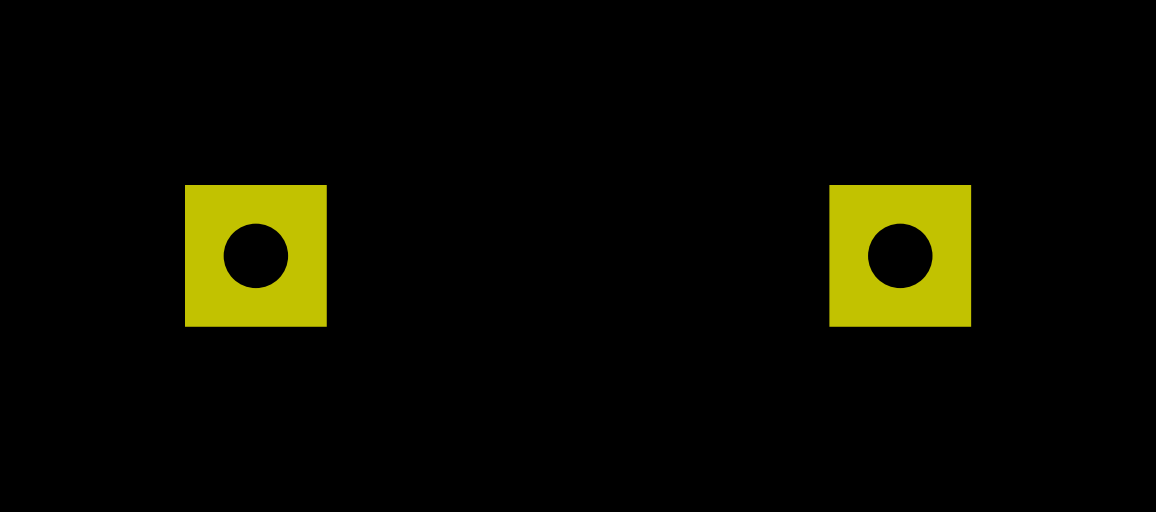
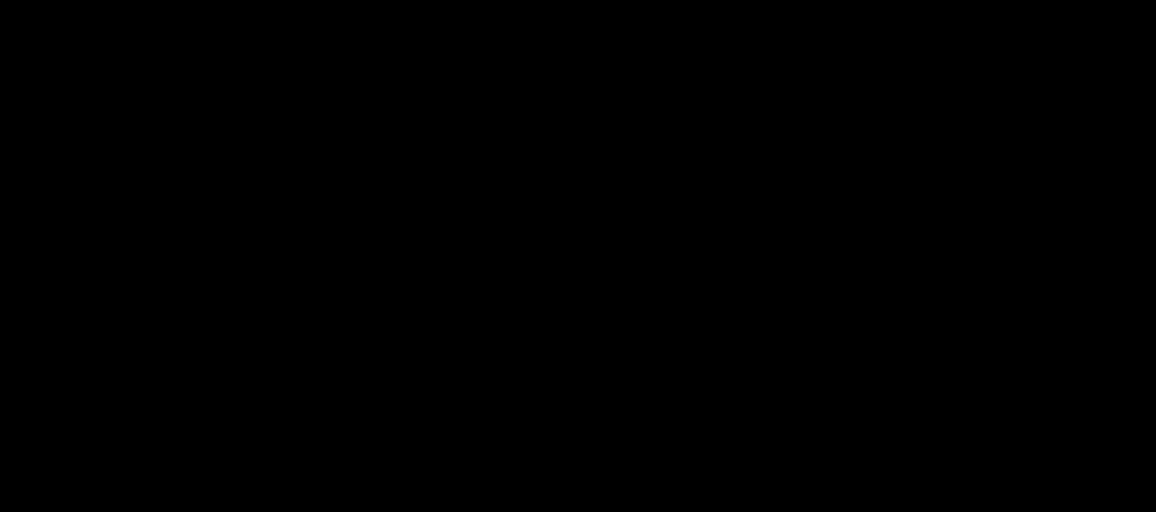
part: (255, 255) -> none
part: (900, 255) -> none

